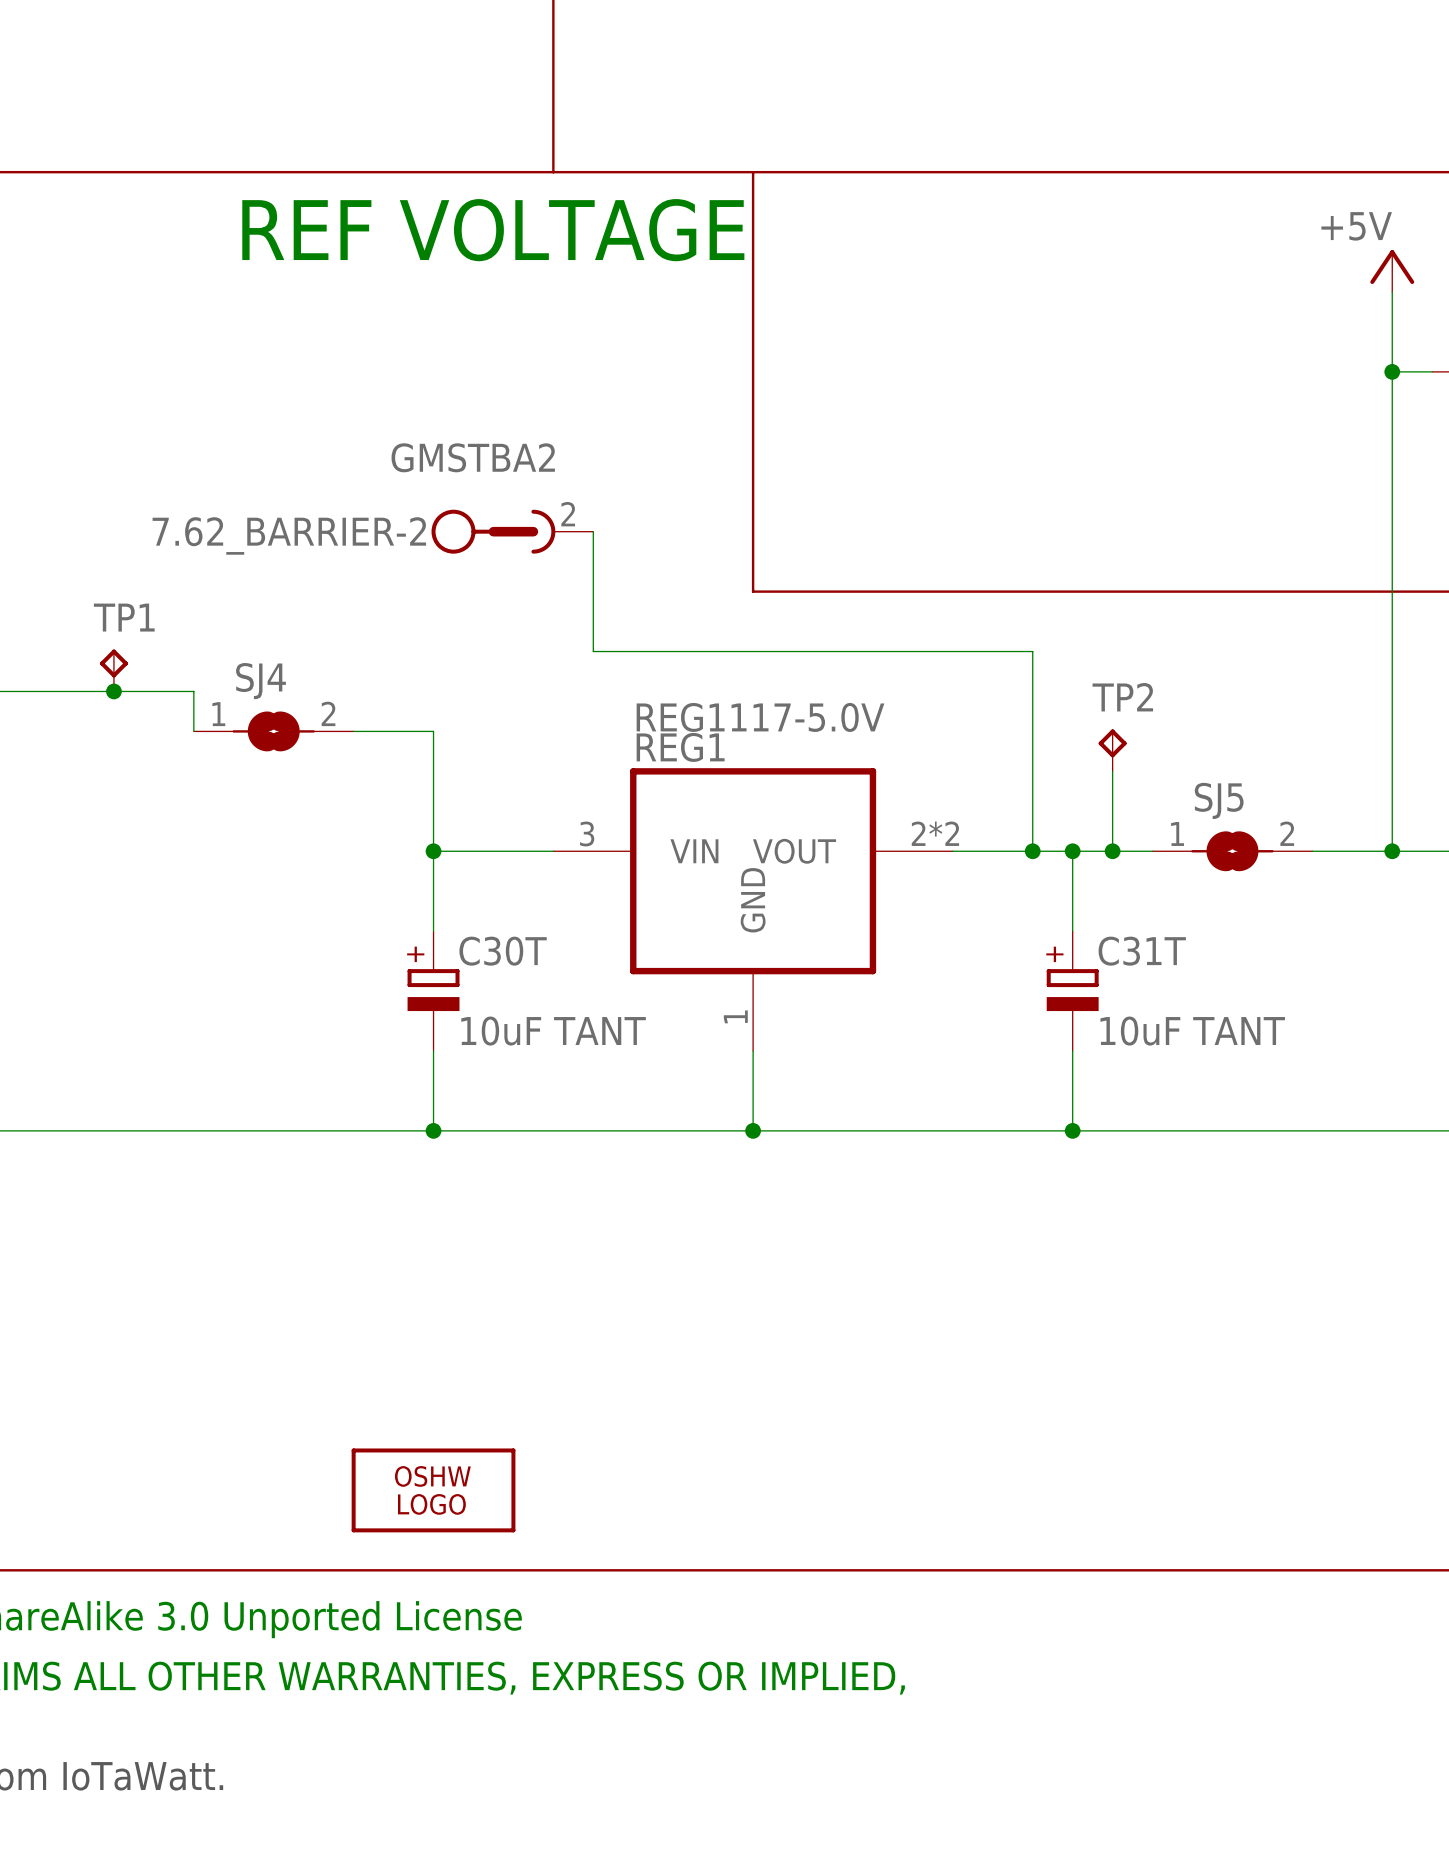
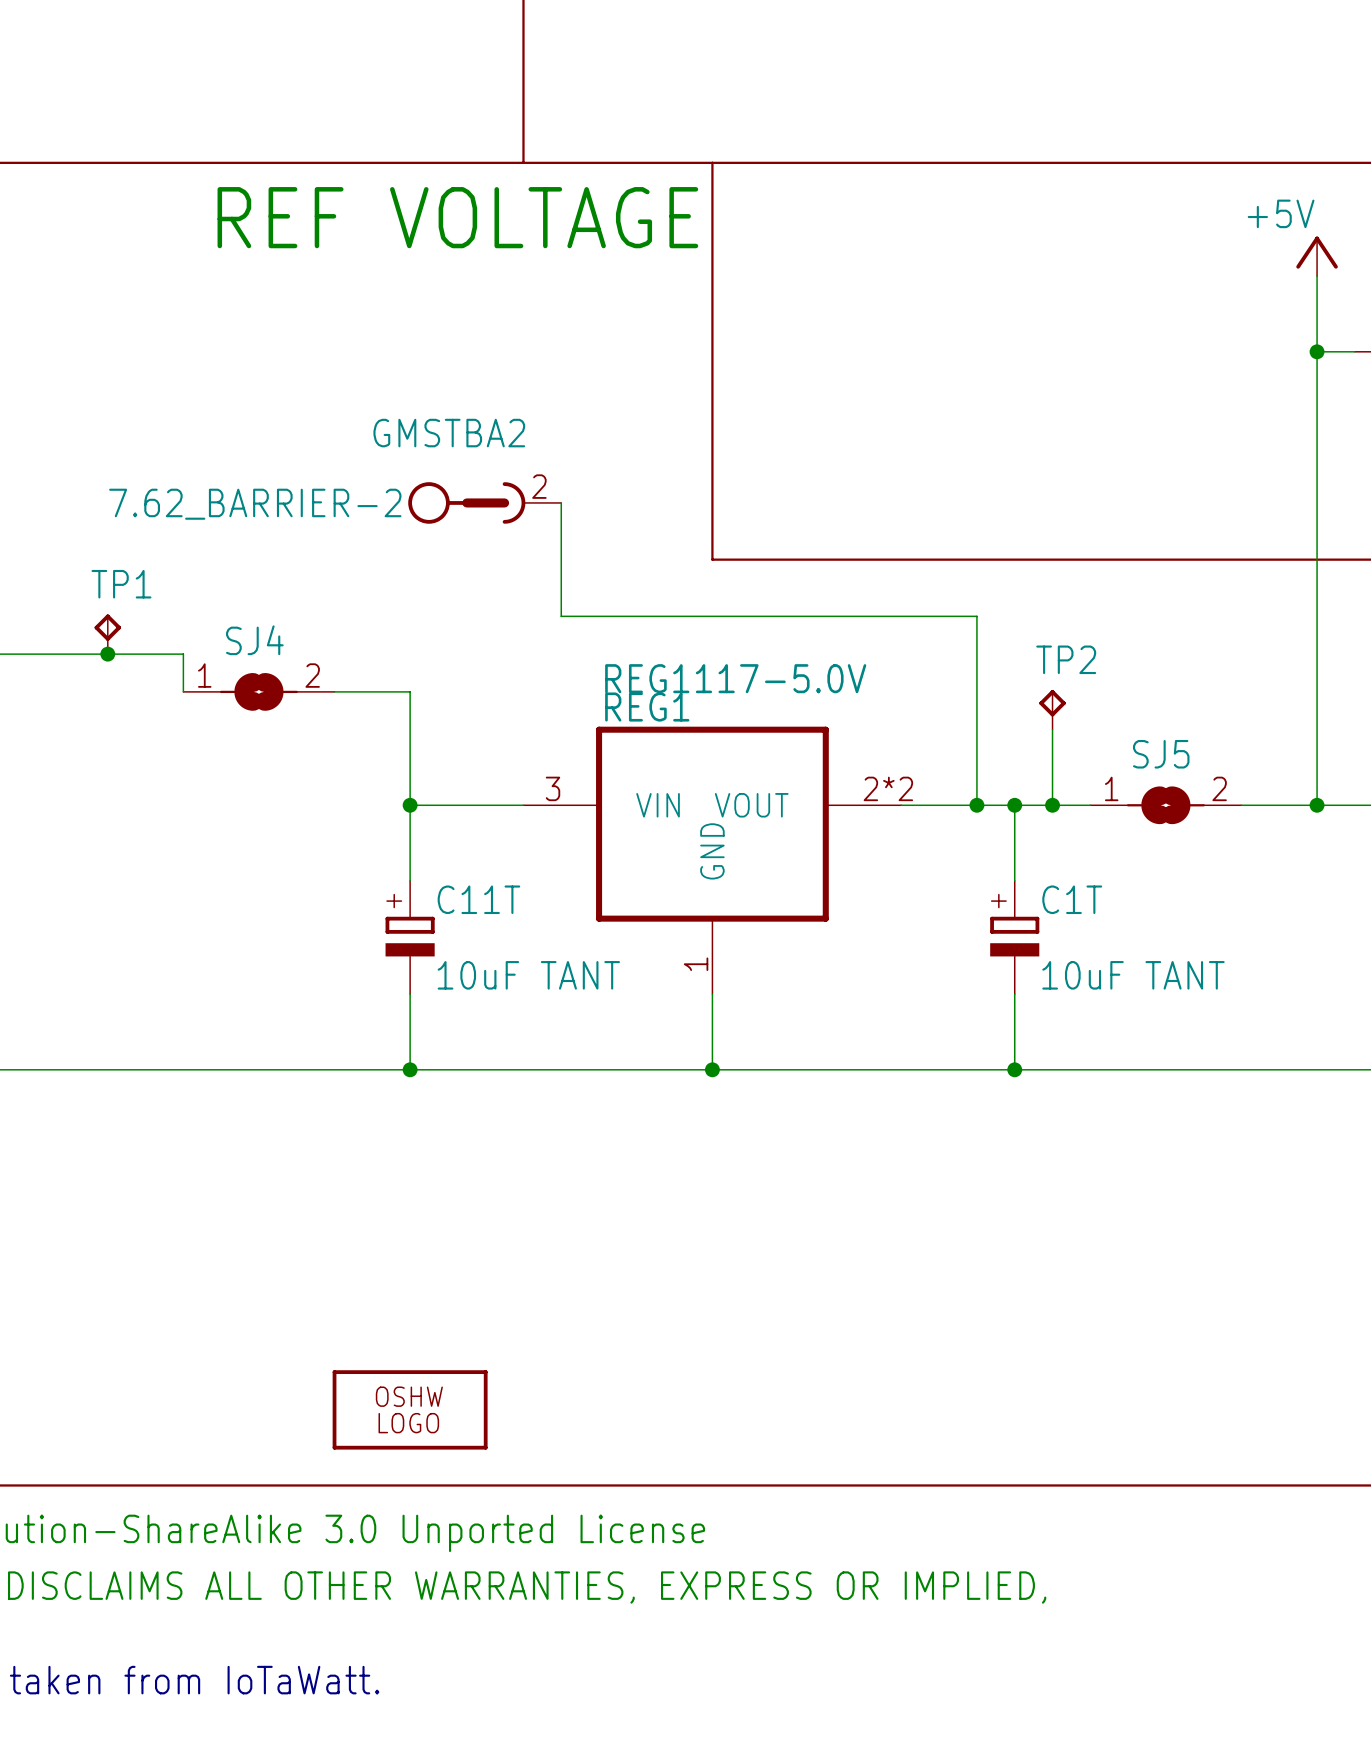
C30T name: C30T (503, 951) -> C11T (478, 899)
C31T name: C31T (1142, 951) -> C1T (1072, 899)

